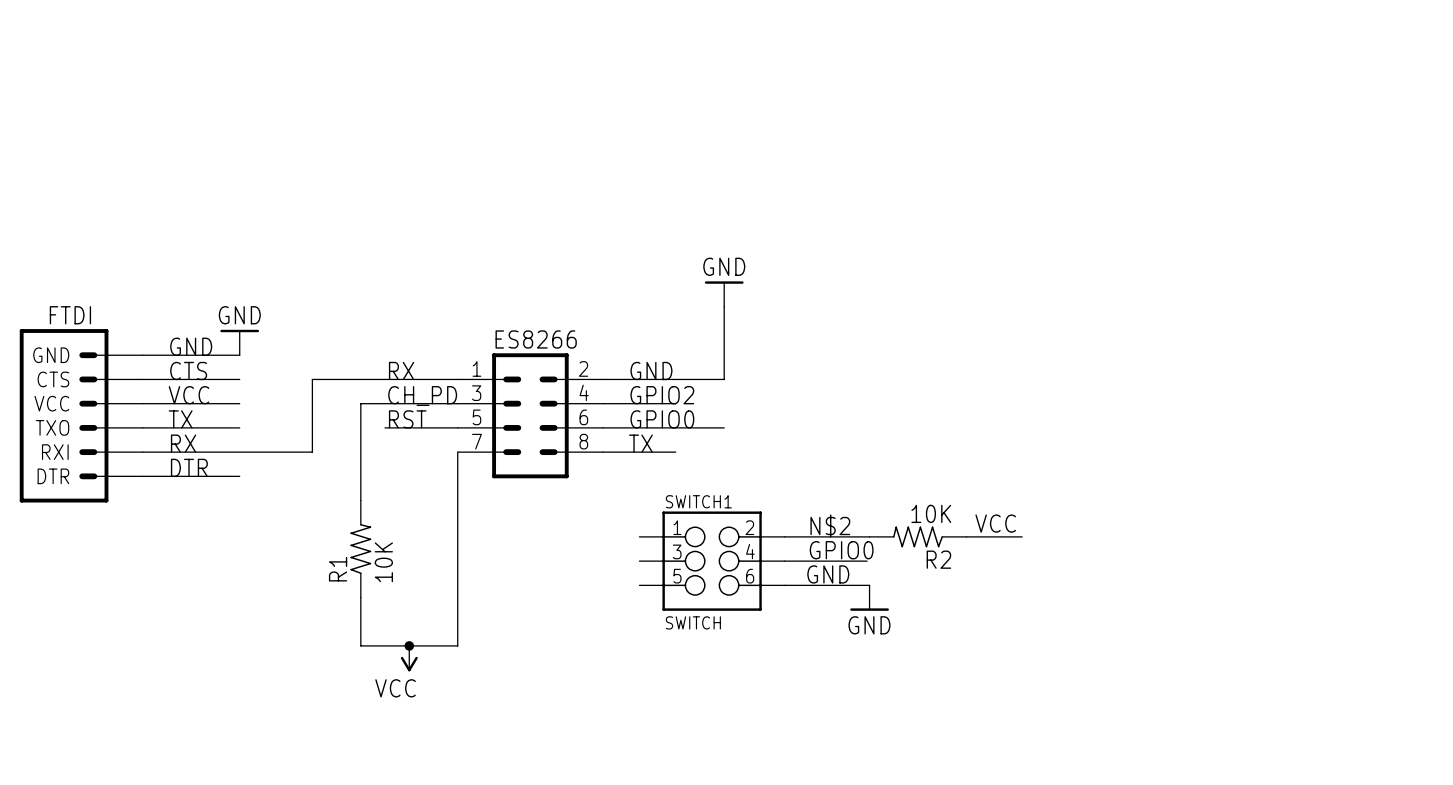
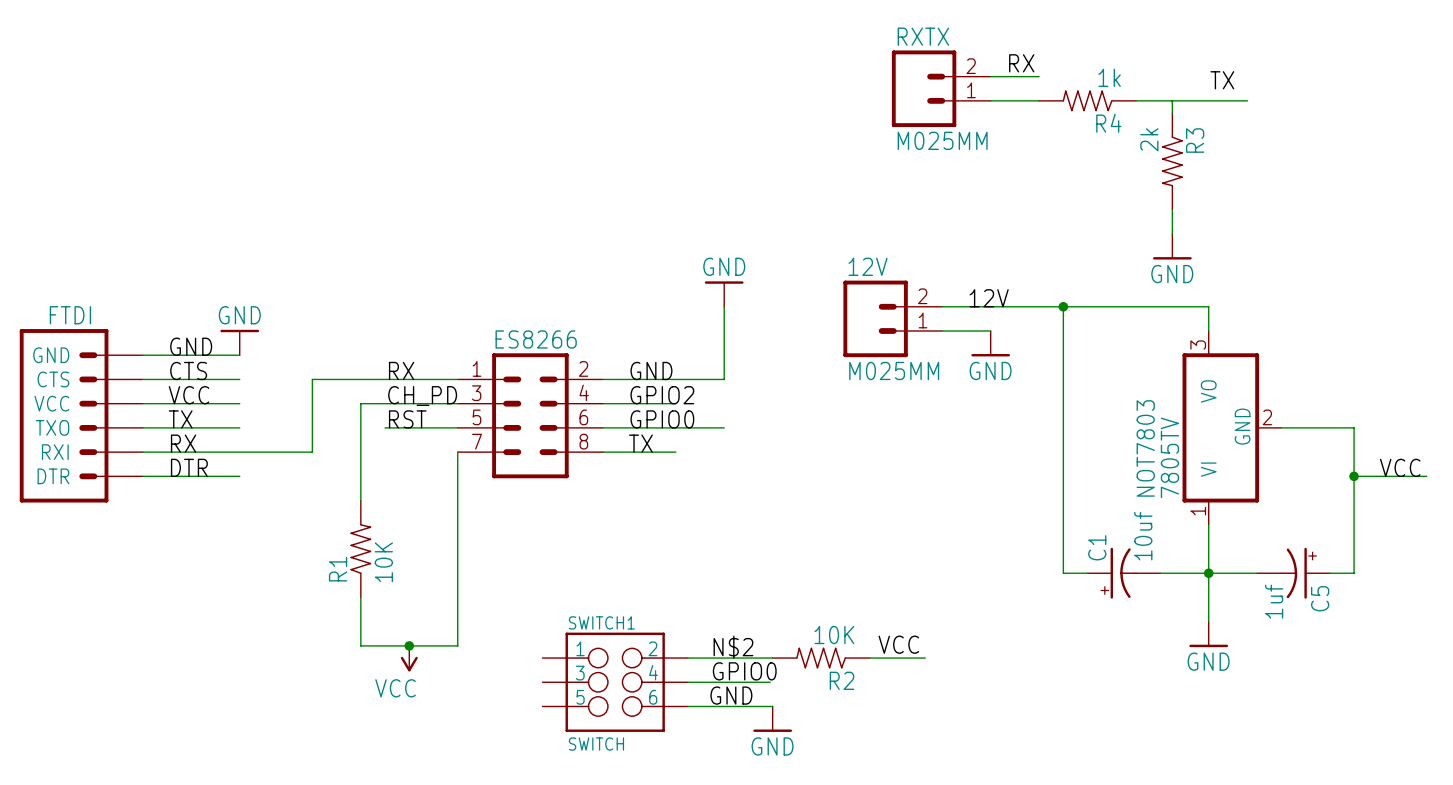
label: none -> RX (1021, 63)
wire: none -> (990, 76) (1039, 76)
label: none -> TX (1222, 80)
RXTX: none -> M025MM (941, 88)
wire: none -> (990, 100) (1039, 100)
R4: none -> 1k (1087, 100)
wire: none -> (1136, 100) (1247, 100)
wire: none -> (1172, 100) (1172, 112)
R3: none -> 2k (1172, 161)
wire: none -> (1172, 209) (1172, 234)
power symbol: none -> GND (1172, 246)
label: none -> 12V (989, 298)
wire: none -> (942, 306) (1208, 306) (1208, 331)
wire: none -> (1063, 306) (1063, 573) (1087, 573)
junction: none -> (1063, 306)
12V: none -> M025MM (892, 318)
wire: none -> (942, 331) (990, 331)
power symbol: none -> GND (990, 343)
NOT7803: none -> 7805TV (1231, 427)
wire: none -> (1281, 427) (1354, 427) (1354, 573) (1329, 573)
label: none -> VCC (1400, 467)
wire: none -> (1354, 476) (1426, 476)
junction: none -> (1354, 476)
label position: VCC (995, 523) -> VCC (898, 644)
wire: none -> (1208, 524) (1208, 621)
label position: N$2 (830, 526) -> N$2 (733, 647)
wire: (784, 536) (869, 536) -> (687, 658) (772, 658)
R2 position: (918, 536) -> (821, 658)
wire: (966, 536) (1022, 536) -> (869, 658) (925, 658)
label position: GPIO0 (841, 550) -> GPIO0 (744, 671)
SWITCH1 position: (712, 561) -> (615, 682)
wire: (784, 561) (867, 561) -> (687, 682) (770, 682)
C1: none -> 10uf (1123, 573)
wire: none -> (1160, 573) (1257, 573)
junction: none -> (1208, 573)
C5: none -> 1uf (1293, 573)
label position: GND (828, 574) -> GND (731, 695)
wire: (784, 585) (869, 585) -> (687, 706) (772, 706)
power symbol: GND (869, 598) -> none
power symbol: none -> GND (1208, 634)
power symbol: none -> GND (772, 719)

